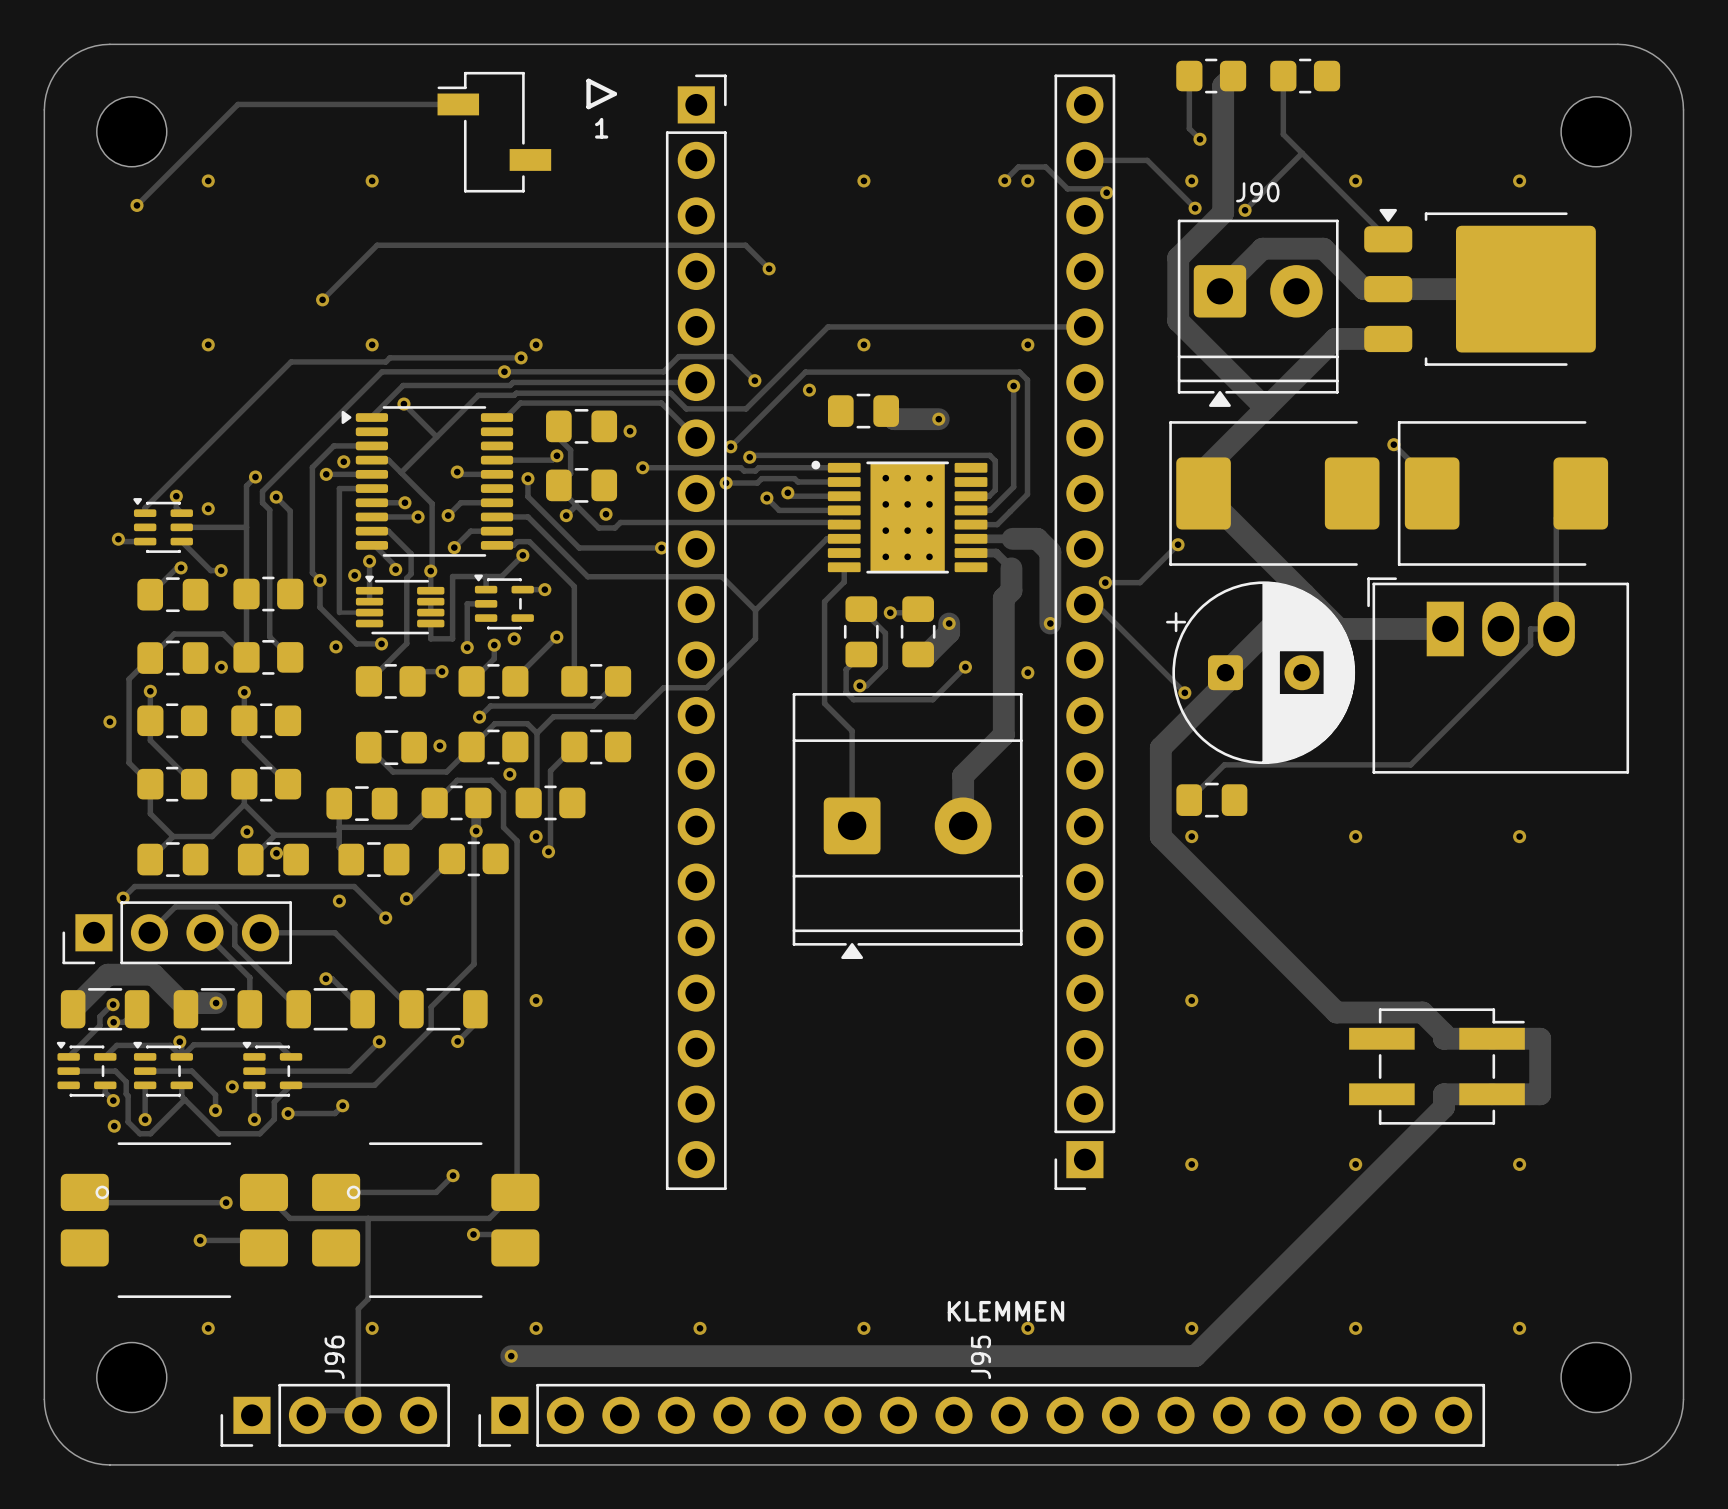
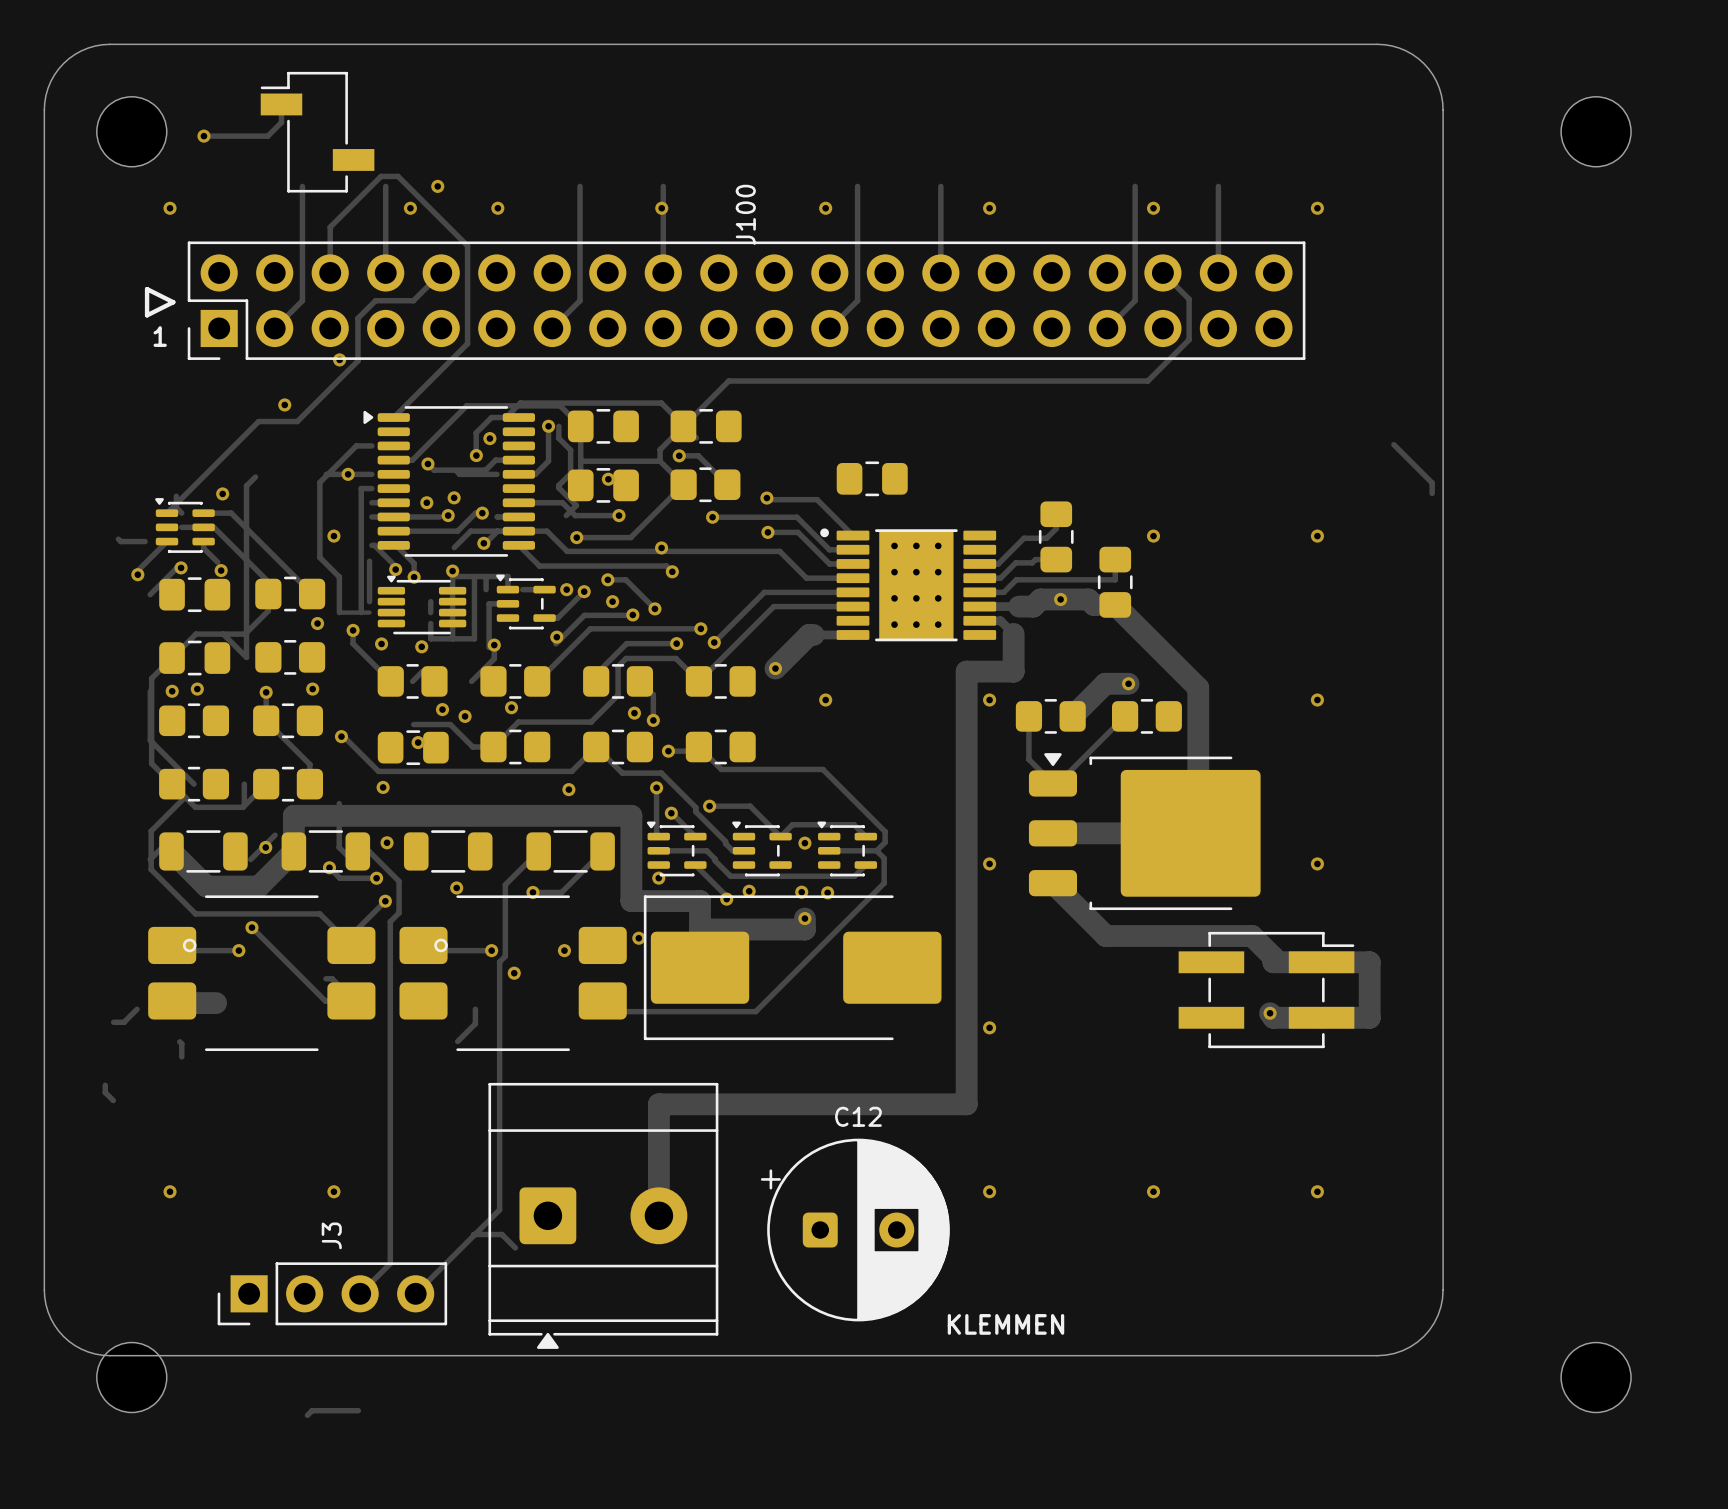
board edge: (1377, 44) (1625, 44) (1646, 50) (1664, 63) (1677, 81) (1681, 95) (1683, 109) (1683, 1399) (1678, 1424) (1664, 1445) (1643, 1459) (1617, 1464) (102, 1464) (81, 1458) (69, 1450) (54, 1434) (48, 1421) (44, 1399) (44, 1290) -> (1377, 44) (1399, 48) (1412, 54) (1423, 63) (1436, 81) (1441, 95) (1443, 109) (1443, 1290) (1438, 1315) (1423, 1336) (1402, 1350) (1377, 1355) (109, 1355) (95, 1354) (81, 1349) (63, 1336) (50, 1318) (45, 1304) (44, 1290)
track: (1189, 76) (1189, 128) (1199, 139) -> none
part: (1211, 76) -> none
track: (1233, 76) (1223, 85) (1223, 212) (1178, 257) (1178, 320) (1265, 408) -> none
track: (1283, 76) (1283, 134) (1388, 239) -> none
part: (1305, 76) -> none
line: (588, 80) (588, 107) (614, 93) (588, 80) -> (147, 289) (147, 315) (173, 302) (147, 289)
track: none -> (281, 104) (281, 122) (267, 136) (203, 136)
track: (458, 104) (237, 104) (136, 205) -> none
text position: 1 (601, 128) -> 1 (160, 336)
part position: (494, 132) -> (317, 132)
via: none -> (203, 136)
via: (1199, 139) -> none
track: (1302, 153) (1245, 210) -> none
track: (1084, 160) (1147, 160) (1195, 208) -> none
via: (208, 180) -> none
via: (372, 180) -> none
via: (863, 180) -> none
track: (1004, 180) (1018, 167) (1045, 167) (1067, 188) (1102, 188) (1106, 192) -> none
via: (1004, 180) -> none
via: (1027, 180) -> none
via: (1191, 180) -> none
via: (1355, 180) -> none
via: (1519, 180) -> none
track: none -> (302, 186) (302, 300) (274, 328)
track: none -> (385, 186) (385, 272)
via: none -> (437, 186)
track: none -> (580, 186) (580, 300) (552, 328)
track: none -> (663, 186) (663, 272)
track: none -> (857, 186) (857, 300) (829, 328)
track: none -> (940, 186) (940, 272)
track: none -> (1135, 186) (1135, 300) (1107, 328)
track: none -> (1218, 186) (1218, 272)
via: (1106, 192) -> none
via: (136, 205) -> none
via: none -> (170, 208)
via: none -> (410, 208)
via: none -> (497, 208)
via: none -> (661, 208)
via: none -> (825, 208)
via: none -> (989, 208)
via: none -> (1153, 208)
via: (1195, 208) -> none
via: none -> (1317, 208)
via: (1245, 210) -> none
track: (769, 268) (745, 245) (377, 245) (322, 299) -> none
via: (769, 268) -> none
track: none -> (330, 272) (330, 227) (381, 176) (398, 176) (467, 245) (467, 343) (393, 417)
track: none -> (441, 272) (413, 300) (375, 300) (357, 318) (357, 360) (297, 421) (258, 421) (167, 513)
track: none -> (1162, 272) (1189, 299) (1189, 339) (1147, 381) (728, 381) (660, 449) (660, 461)
part: (1480, 287) -> none
track: (1525, 289) (1363, 289) (1323, 248) (1262, 248) (1219, 291) -> none
via: (322, 299) -> none
J100: none -> (746, 300)
J90: (1258, 313) -> none
track: (1084, 326) (828, 326) (746, 408) (686, 408) (670, 393) (516, 393) (514, 395) (478, 395) (401, 472) -> none
track: (1388, 338) (1335, 338) (1203, 470) (1203, 493) (1304, 594) -> none
via: (208, 344) -> none
via: (372, 344) -> none
via: (536, 344) -> none
via: (863, 344) -> none
via: (1027, 344) -> none
track: (521, 357) (389, 357) (385, 361) (291, 361) (145, 507) (145, 513) -> none
via: (521, 357) -> none
via: none -> (339, 359)
via: (504, 371) -> none
track: (754, 380) (730, 356) (678, 356) (663, 371) (382, 371) (262, 491) (262, 502) (269, 509) (269, 636) (290, 657) -> none
via: (754, 380) -> none
track: (696, 382) (513, 382) (510, 385) (403, 385) (371, 417) -> none
track: (1013, 386) (1013, 487) (990, 510) (971, 510) -> none
via: (1013, 386) -> none
via: (809, 390) -> none
via: none -> (284, 404)
track: (403, 404) (436, 436) -> none
via: (403, 404) -> none
part position: (863, 411) -> (872, 478)
track: (886, 411) (894, 419) (938, 419) -> none
track: none -> (497, 417) (491, 417) (476, 432) (476, 455)
via: (938, 419) -> none
track: none -> (548, 426) (548, 461) (535, 474) (518, 474)
via: none -> (548, 426)
part position: (581, 426) -> (603, 426)
part: none -> (706, 426)
via: (630, 431) -> none
via: none -> (489, 438)
via: (1393, 444) -> none
track: (356, 445) (333, 445) (312, 467) (312, 572) (320, 580) (320, 607) (356, 643) (381, 643) -> (356, 445) (319, 482) (319, 557) (339, 577) (339, 612)
track: (730, 446) (805, 372) (1019, 372) (1027, 379) (1027, 494) (997, 524) (971, 524) -> none
via: (730, 446) -> none
via: none -> (476, 455)
track: (556, 455) (552, 460) (518, 460) -> none
via: (556, 455) -> none
track: none -> (679, 455) (698, 455) (727, 484)
via: none -> (679, 455)
track: (749, 457) (751, 455) (989, 455) (995, 460) (995, 490) (989, 496) (971, 496) -> none
via: (749, 457) -> none
track: (371, 460) (388, 460) (432, 503) (430, 590) -> none
track: none -> (393, 460) (412, 460) (466, 405) (560, 405) (580, 426) (580, 485)
track: none -> (497, 460) (485, 470) (434, 470) (427, 463)
via position: (343, 461) -> (348, 474)
track: none -> (580, 461) (660, 461)
track: none -> (660, 461) (683, 484) (630, 537) (576, 537)
via: none -> (427, 463)
track: (642, 467) (740, 467) (744, 470) (755, 470) (758, 467) (844, 467) -> none
via: (642, 467) -> none
via: (457, 472) -> none
via: (326, 474) -> none
via: (255, 477) -> none
track: (527, 478) (527, 496) (579, 547) (661, 547) -> none
via: (527, 478) -> none
via: none -> (608, 479)
part position: (427, 481) -> (449, 481)
track: (844, 482) (797, 482) (794, 478) (761, 478) (757, 483) (726, 483) -> none
via: (726, 483) -> none
part: none -> (705, 484)
part position: (581, 485) -> (603, 485)
track: (361, 488) (339, 488) (339, 612) -> (361, 488) (361, 612)
track: (787, 492) (791, 496) (844, 496) -> none
via: (787, 492) -> none
via: none -> (222, 493)
part: (1274, 493) -> none
part: (1502, 493) -> none
track: (1580, 493) (1556, 517) (1556, 628) (1530, 628) (1530, 645) (1410, 764) (1224, 764) (1189, 800) -> none
via: (176, 496) -> none
track: (276, 497) (290, 511) (290, 594) -> none
via: (276, 497) -> none
via: none -> (454, 497)
track: (766, 498) (779, 510) (844, 510) -> none
track: none -> (764, 499) (817, 499) (853, 535)
via: (404, 502) -> none
via: none -> (426, 502)
track: (497, 502) (460, 502) (448, 515) -> none
track: none -> (518, 502) (562, 502) (575, 515) (619, 515)
track: (576, 505) (598, 527) (615, 527) (620, 522) (842, 522) (844, 524) -> none
via: (208, 508) -> none
track: none -> (203, 513) (231, 513) (312, 594)
track: none -> (482, 513) (475, 513) (457, 531) (393, 531)
via: none -> (482, 513)
via position: (606, 514) -> (619, 515)
track: none -> (1056, 514) (1056, 528) (1046, 538) (1024, 538) (998, 563) (979, 563)
via: (566, 515) -> none
track: none -> (418, 516) (439, 516)
via: (418, 516) -> none
track: (518, 516) (528, 516) (587, 576) (721, 576) (755, 610) -> none
track: none -> (712, 517) (796, 517) (829, 549) (853, 549)
via: none -> (712, 517)
part position: (899, 517) -> (908, 584)
part position: (163, 525) -> (184, 525)
track: (213, 527) (246, 527) -> (213, 527) (268, 581) (268, 610) (245, 634) (223, 634)
track: (371, 531) (388, 531) (411, 553) (411, 573) (406, 578) (406, 643) (368, 681) -> none
track: none -> (767, 532) (798, 532) (829, 563) (853, 563)
via: none -> (767, 532)
via: none -> (333, 536)
part: none -> (1056, 536)
via: none -> (1317, 536)
via: none -> (576, 537)
track: (844, 538) (826, 538) (755, 610) -> none
track: (971, 538) (1037, 538) (1050, 551) (1050, 623) -> none
via position: (118, 539) -> (137, 574)
track: none -> (167, 541) (137, 570) (137, 574)
track: (181, 541) (210, 570) (221, 570) -> none
track: none -> (203, 541) (203, 548) (217, 562)
track: none -> (483, 543) (497, 531) (547, 531) (567, 551) (779, 551) (806, 578) (853, 578)
via: none -> (483, 543)
track: (1178, 544) (1140, 582) (1105, 582) -> none
via position: (1178, 544) -> (1153, 536)
track: none -> (393, 545) (396, 545) (414, 563) (414, 577)
track: (497, 545) (513, 545) (517, 541) (529, 541) (574, 586) (574, 681) -> none
track: none -> (518, 545) (539, 566) (666, 566) (672, 571)
via: (454, 547) -> none
track: (971, 553) (996, 553) (1011, 568) (1011, 590) (1003, 598) (1003, 734) (963, 775) (963, 825) -> none
track: (522, 555) (501, 576) -> (507, 589) (507, 576) (501, 576)
via: (522, 555) -> none
track: none -> (1056, 559) (1035, 559) (1032, 562) (1015, 562) (1000, 578) (979, 578)
track: none -> (1115, 559) (1115, 579) (1016, 579) (1003, 592) (979, 592)
via: (369, 561) -> none
track: (844, 567) (844, 581) (824, 601) (824, 703) (852, 731) (852, 825) -> none
via: (430, 571) -> none
via: none -> (452, 571)
via: none -> (672, 571)
via: (354, 575) -> none
track: none -> (474, 576) (474, 638) (452, 638)
via: none -> (414, 577)
track: none -> (607, 579) (625, 579) (654, 608)
via: none -> (607, 579)
via: (320, 580) -> none
via: (1105, 582) -> none
part: none -> (1115, 582)
via: (544, 589) -> none
via: none -> (566, 589)
track: none -> (584, 591) (557, 618) (544, 618)
via: none -> (584, 591)
track: none -> (853, 592) (764, 592) (714, 642)
part position: (172, 594) -> (194, 594)
part position: (268, 594) -> (290, 594)
track: (1304, 594) (1339, 628) (1445, 628) -> none
track: (1304, 594) (1225, 672) (1225, 683) (1160, 747) (1160, 836) (1336, 1012) (1422, 1012) (1443, 1033) (1443, 1038) (1540, 1038) (1540, 1094) (1443, 1094) (1443, 1107) (1195, 1356) (511, 1356) -> none
via: none -> (1060, 599)
part position: (504, 601) -> (525, 601)
via: none -> (612, 601)
track: (486, 603) (467, 603) (467, 647) -> (507, 603) (489, 603) (489, 647)
part position: (400, 604) -> (422, 604)
track: (1084, 604) (1096, 604) (1184, 692) -> none
track: none -> (853, 606) (773, 606) (698, 681) (675, 658) (626, 658) (618, 666) (618, 695) (591, 722) (518, 722) (493, 747) (472, 747) (450, 724) (413, 724)
track: none -> (979, 606) (1033, 606) (1040, 599) (1088, 599) (1093, 604) (1115, 604) (1198, 687) (1198, 825) (1190, 833) (1052, 833)
via: none -> (654, 608)
track: (861, 609) (885, 633) (885, 666) (866, 685) (859, 685) -> none
track: (755, 610) (755, 638) (706, 687) (663, 687) (634, 716) (553, 716) (536, 733) -> none
via: (890, 612) -> none
track: none -> (632, 614) (584, 615) (555, 643)
via: none -> (632, 614)
track: none -> (979, 620) (1000, 620) (1013, 633) (1013, 671) (966, 671) (966, 1104) (658, 1104) (658, 1215)
via: none -> (317, 623)
track: (949, 623) (949, 632) (927, 654) (918, 654) -> none
via: (949, 623) -> none
via: (1050, 623) -> none
track: none -> (700, 628) (590, 628) (537, 681)
via: none -> (700, 628)
track: none -> (353, 630) (353, 643) (390, 681)
via: none -> (353, 630)
part: (861, 631) -> none
part: (918, 631) -> none
part: (696, 632) -> none
part: (1084, 632) -> none
track: (195, 634) (174, 634) (129, 679) (129, 762) (150, 784) (150, 813) (173, 836) (212, 836) (244, 804) (275, 835) (339, 835) -> (195, 634) (151, 678) (151, 763) (195, 807) (243, 807) (266, 784)
track: none -> (853, 634) (809, 634) (775, 668)
track: (556, 637) (515, 678) (515, 681) -> none
via: (514, 638) -> none
via: none -> (714, 642)
track: none -> (676, 643) (626, 643) (596, 674) (596, 681)
via: none -> (676, 643)
via: (335, 646) -> none
via: none -> (421, 646)
via: (467, 647) -> none
track: (861, 654) (846, 669) (846, 692) (853, 699) (932, 699) (965, 667) -> none
part position: (268, 657) -> (290, 657)
part position: (172, 658) -> (194, 658)
via: (221, 667) -> none
via: (965, 667) -> none
via: none -> (775, 668)
via: (442, 671) -> none
via: (1027, 672) -> none
part: (1260, 672) -> none
part: (1498, 675) -> none
part position: (390, 681) -> (412, 681)
part position: (493, 681) -> (515, 681)
part position: (596, 681) -> (618, 681)
track: (618, 681) (593, 706) (490, 706) (479, 717) -> none
track: none -> (639, 681) (653, 694) (653, 720)
part: none -> (720, 681)
track: none -> (1128, 683) (1105, 683) (1072, 716)
via: none -> (1128, 683)
via position: (859, 685) -> (825, 700)
via: none -> (197, 689)
via: none -> (312, 689)
via position: (150, 691) -> (172, 691)
track: (244, 692) (244, 740) (288, 784) -> none
via position: (244, 692) -> (266, 692)
track: none -> (266, 692) (266, 720) (309, 764) (309, 784)
via: (1184, 692) -> none
via: none -> (989, 700)
via: none -> (1317, 700)
via: none -> (511, 707)
via: none -> (442, 709)
via: none -> (634, 713)
track: none -> (1028, 716) (1028, 759) (1052, 783) (1058, 783) (1125, 716)
part: none -> (1050, 716)
part: none -> (1146, 716)
via position: (479, 717) -> (465, 716)
part position: (172, 720) -> (194, 720)
part position: (266, 720) -> (288, 720)
via: none -> (653, 720)
via: (109, 721) -> none
track: (536, 733) (536, 794) (528, 802) -> none
track: (536, 733) (527, 723) (494, 723) (446, 771) (393, 771) (368, 747) -> none
track: none -> (341, 736) (342, 735) (378, 771) (571, 771) (596, 747) (622, 773) (661, 773) (695, 807) (695, 811) (732, 850) (743, 850)
via: none -> (341, 736)
via: none -> (418, 742)
via: (439, 745) -> none
part position: (391, 747) -> (413, 747)
part position: (493, 747) -> (515, 747)
track: (574, 747) (550, 770) (550, 849) (548, 851) -> none
part position: (596, 747) -> (618, 747)
part: none -> (720, 747)
track: none -> (668, 751) (694, 751) (698, 747) (721, 769) (822, 769) (885, 831) (885, 842) (876, 850)
via: none -> (668, 751)
via: (509, 774) -> none
part position: (172, 784) -> (194, 784)
part position: (266, 784) -> (288, 784)
via: none -> (383, 787)
track: none -> (656, 787) (656, 834) (658, 836)
via: none -> (656, 787)
via: none -> (568, 789)
track: none -> (185, 797) (151, 831) (151, 869) (195, 913) (319, 913) (351, 945)
part: (1211, 800) -> none
part: (456, 802) -> none
part: (550, 802) -> none
part: (361, 803) -> none
track: none -> (709, 806) (750, 806) (780, 836) (792, 824) (853, 824) (865, 836)
via: none -> (709, 806)
track: none -> (671, 813) (695, 836)
via: none -> (671, 813)
part position: (907, 826) -> (603, 1215)
track: (339, 827) (410, 827) (457, 780) (491, 780) (503, 792) (503, 827) (517, 840) (517, 1190) (489, 1218) (290, 1218) (263, 1192) -> none
via: (246, 831) -> none
track: (476, 831) (478, 828) (478, 802) (474, 807) (474, 964) (431, 1007) (431, 1028) (374, 1085) (291, 1085) (274, 1102) (274, 1119) (259, 1133) (218, 1133) (181, 1096) (181, 1085) -> none
via: (476, 831) -> none
part: none -> (1144, 831)
via: (536, 836) -> none
via: (1191, 836) -> none
via position: (1355, 836) -> (1317, 863)
via: (1519, 836) -> none
via: none -> (387, 842)
via: none -> (804, 843)
part: none -> (676, 848)
part: none -> (761, 848)
part: none -> (847, 848)
track: none -> (658, 850) (706, 850) (730, 876) (854, 876) (865, 865)
track: none -> (829, 850) (876, 850)
track: none -> (876, 850) (884, 858) (884, 883) (755, 1011) (613, 1011) (602, 1000)
track: none -> (171, 851) (206, 886) (258, 886) (293, 851) (293, 815) (631, 815) (631, 901) (700, 901) (700, 967)
part: none -> (203, 851)
part: none -> (325, 851)
track: none -> (357, 851) (369, 851) (399, 881) (399, 912) (390, 921) (390, 1263) (360, 1293)
part: none -> (448, 851)
track: none -> (538, 851) (505, 884) (505, 956) (499, 962) (499, 1209) (415, 1293)
via: (548, 851) -> none
part: none -> (570, 851)
track: none -> (602, 851) (561, 892) (532, 892)
via position: (276, 853) -> (265, 847)
track: (451, 858) (412, 898) (406, 898) -> none
part: (473, 858) -> none
part: (172, 859) -> none
part: (273, 859) -> none
part: (373, 859) -> none
via: none -> (989, 863)
track: none -> (695, 865) (726, 896) (726, 899)
track: none -> (329, 867) (339, 878) (376, 878)
via: none -> (329, 867)
via: none -> (376, 878)
via: none -> (658, 878)
track: none -> (1052, 883) (1105, 936) (1252, 936) (1273, 957) (1273, 962) (1369, 962) (1369, 1017) (1273, 1017) (1270, 1013)
via: none -> (456, 887)
via: none -> (749, 891)
via: none -> (532, 892)
via: none -> (801, 892)
via: none -> (827, 892)
track: (123, 898) (134, 886) (354, 886) (385, 917) -> none
via: (123, 898) -> none
via: (406, 898) -> none
via: none -> (726, 899)
via: (339, 901) -> none
track: none -> (385, 901) (346, 940)
via: none -> (385, 901)
via: (385, 917) -> none
track: none -> (804, 918) (804, 929) (700, 929)
via: none -> (804, 918)
track: none -> (251, 927) (325, 1000) (351, 1000)
via: none -> (251, 927)
track: (149, 932) (175, 906) (216, 906) (234, 924) (234, 945) (298, 1009) -> none
part: (177, 932) -> none
track: (204, 932) (249, 977) (249, 1009) -> none
track: (260, 932) (334, 932) (411, 1009) -> none
via: none -> (638, 938)
track: none -> (172, 945) (177, 950) (238, 950)
track: none -> (423, 945) (428, 950) (491, 950)
via: none -> (238, 950)
via: none -> (491, 950)
via: none -> (564, 950)
part: none -> (792, 967)
part: none -> (261, 973)
part: none -> (513, 973)
via: none -> (514, 973)
via: (325, 978) -> none
via: (536, 1000) -> none
via position: (1191, 1000) -> (1270, 1013)
via: (216, 1003) -> none
track: (113, 1004) (99, 1016) (99, 1025) (68, 1056) -> none
via: (113, 1004) -> none
track: (73, 1009) (107, 974) (153, 974) (185, 1009) -> none
part: (105, 1009) -> none
part: (217, 1009) -> none
part: (330, 1009) -> none
part: (443, 1009) -> none
via: (113, 1022) -> none
via: none -> (989, 1027)
via: (179, 1041) -> none
track: (379, 1041) (349, 1071) (254, 1071) -> none
via: (379, 1041) -> none
via: (457, 1041) -> none
track: (105, 1056) (116, 1045) (170, 1045) (181, 1056) (193, 1044) (278, 1044) (291, 1056) -> none
part position: (1436, 1066) -> (1266, 990)
part: (86, 1069) -> none
part: (163, 1069) -> none
part: (272, 1069) -> none
track: (68, 1071) (115, 1071) (126, 1081) (128, 1122) (139, 1133) (150, 1133) (184, 1099) -> none
track: (145, 1071) (191, 1071) (215, 1094) (215, 1110) -> none
track: (145, 1085) (145, 1119) -> none
track: (254, 1085) (254, 1119) -> none
via: (232, 1086) -> none
via: (113, 1100) -> none
track: (342, 1105) (334, 1113) (288, 1113) -> none
via: (342, 1105) -> none
via: (215, 1110) -> none
via: (288, 1113) -> none
via: (145, 1119) -> none
via: (254, 1119) -> none
via: (114, 1126) -> none
via position: (1191, 1164) -> (1153, 1191)
via position: (1355, 1164) -> (1317, 1191)
via: (1519, 1164) -> none
track: (453, 1175) (436, 1192) (336, 1192) -> none
via: (453, 1175) -> none
via: none -> (170, 1191)
via: none -> (333, 1191)
via: none -> (989, 1191)
track: (84, 1192) (95, 1202) (226, 1202) -> none
via: (226, 1202) -> none
track: (368, 1218) (368, 1299) (358, 1308) (358, 1410) (363, 1415) -> none
part: (174, 1220) -> none
part: (425, 1220) -> none
C12: none -> (855, 1230)
via: (473, 1234) -> none
track: (200, 1240) (256, 1240) (263, 1247) -> none
via: (200, 1240) -> none
J3: none -> (332, 1293)
text position: KLEMMEN (1005, 1311) -> KLEMMEN (1005, 1324)
via: (208, 1328) -> none
via: (372, 1328) -> none
via: (536, 1328) -> none
via: (700, 1328) -> none
via: (863, 1328) -> none
via: (1027, 1328) -> none
via: (1191, 1328) -> none
via: (1355, 1328) -> none
via: (1519, 1328) -> none
via: (511, 1356) -> none
J96: (335, 1415) -> none
J95: (981, 1415) -> none

